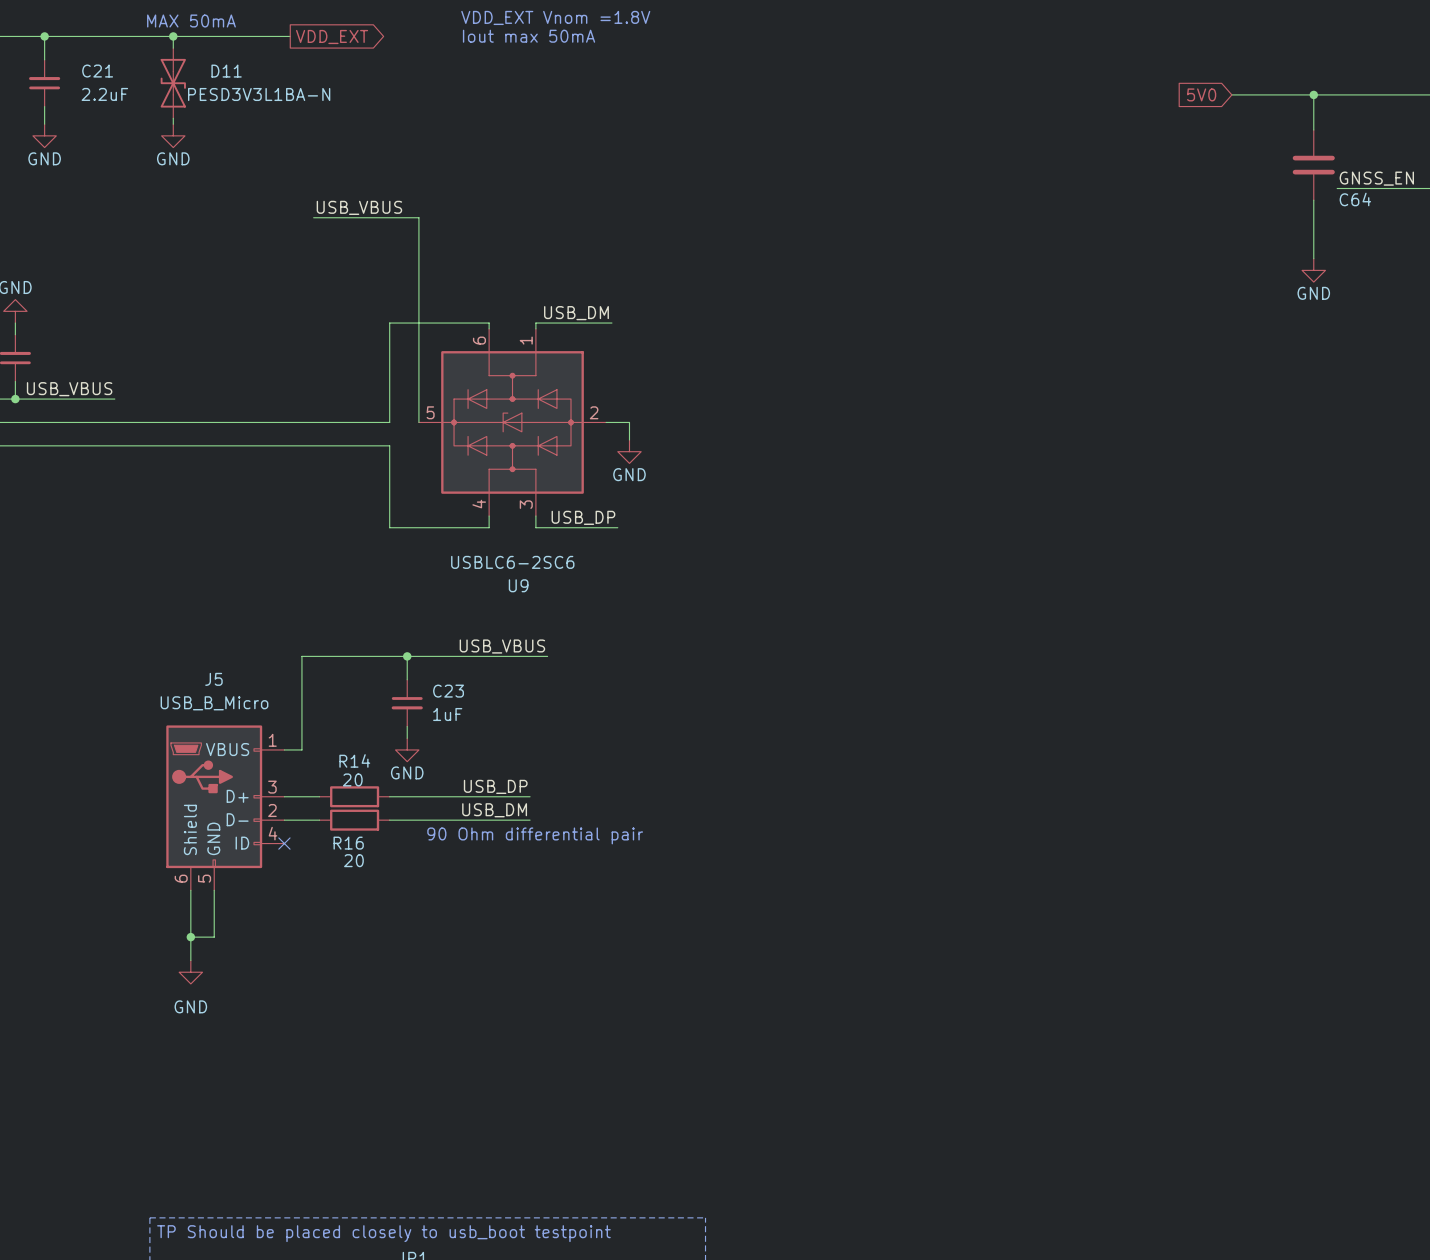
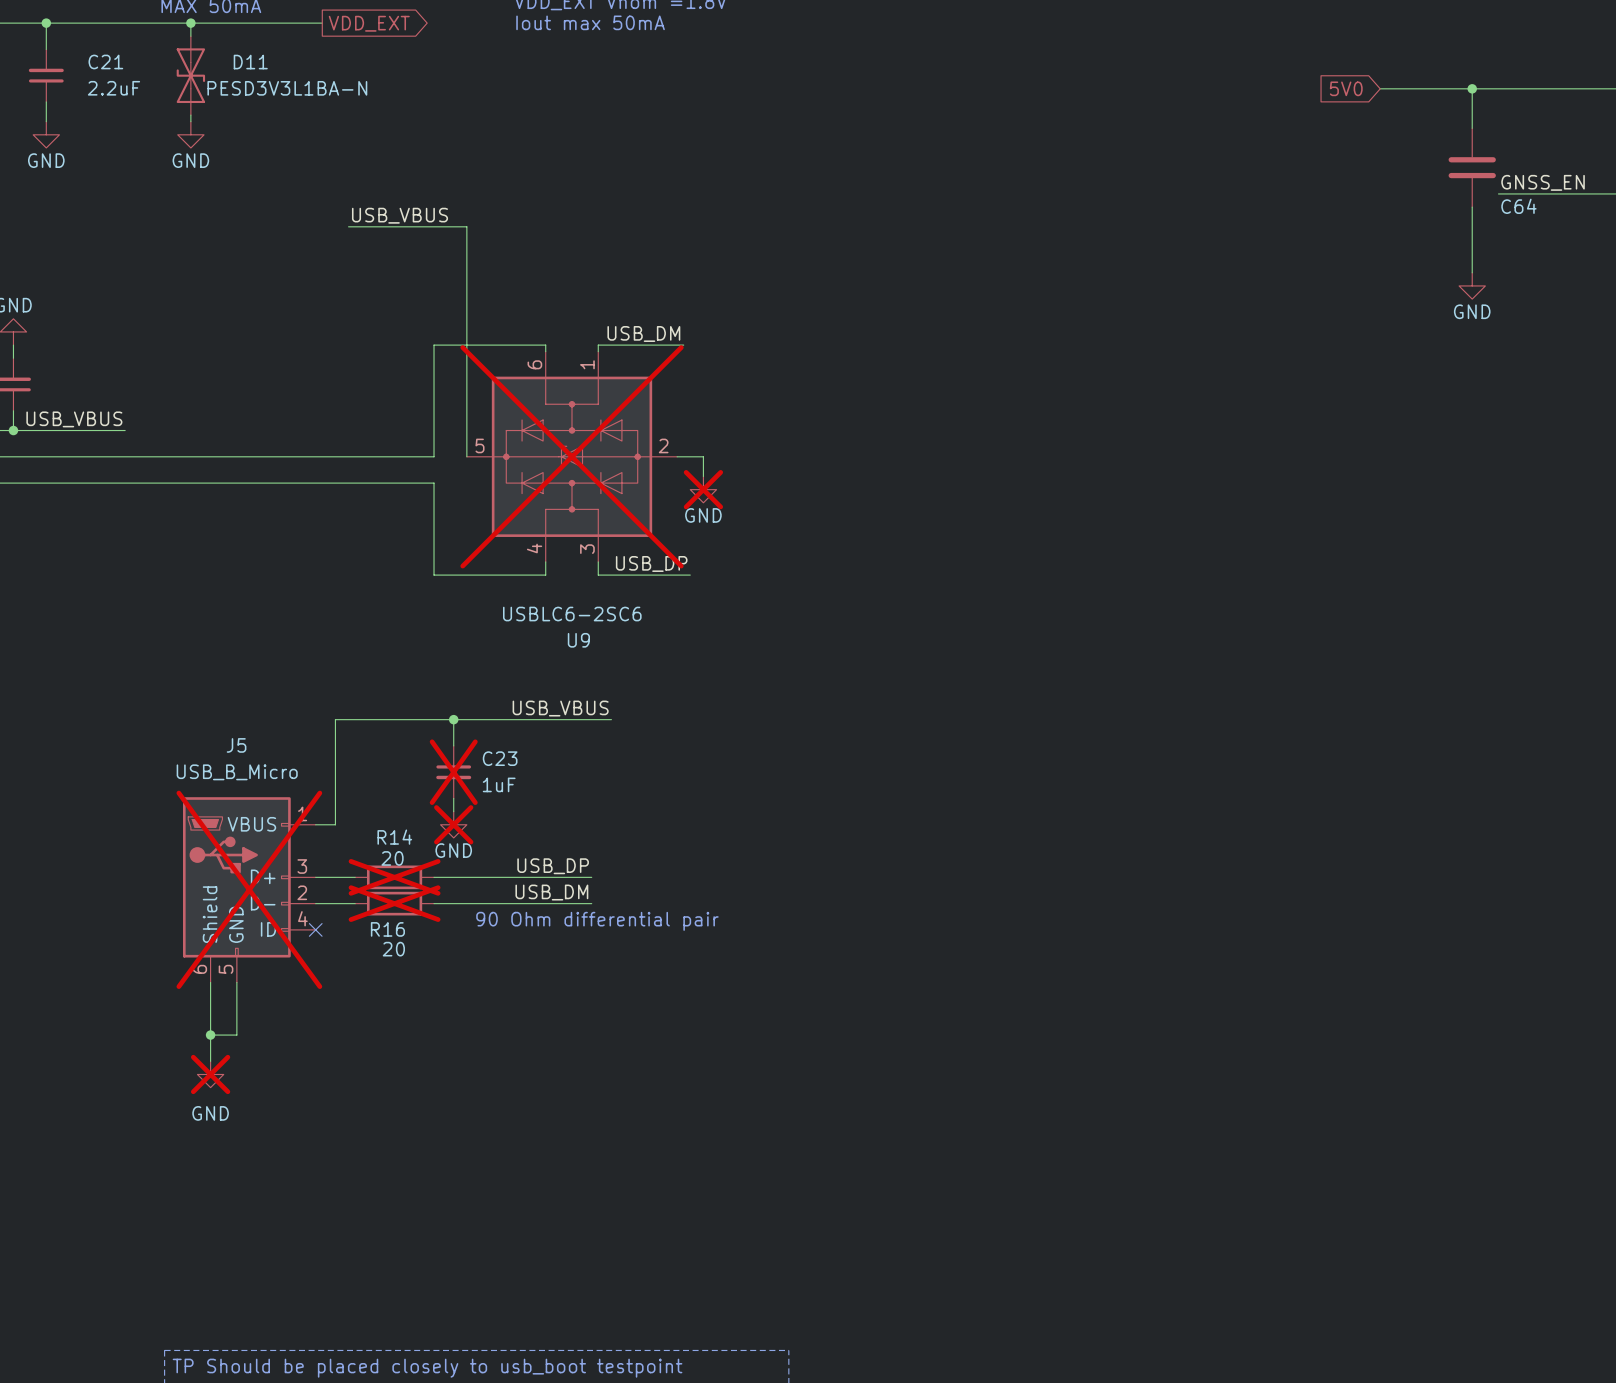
U9 do-not-place cross: none -> (571, 456)
power symbol do-not-place cross: none -> (703, 489)
C23 do-not-place cross: none -> (453, 772)
power symbol do-not-place cross: none -> (453, 824)
R14 do-not-place cross: none -> (394, 877)
J5 do-not-place cross: none -> (249, 889)
R16 do-not-place cross: none -> (394, 903)
power symbol do-not-place cross: none -> (210, 1074)

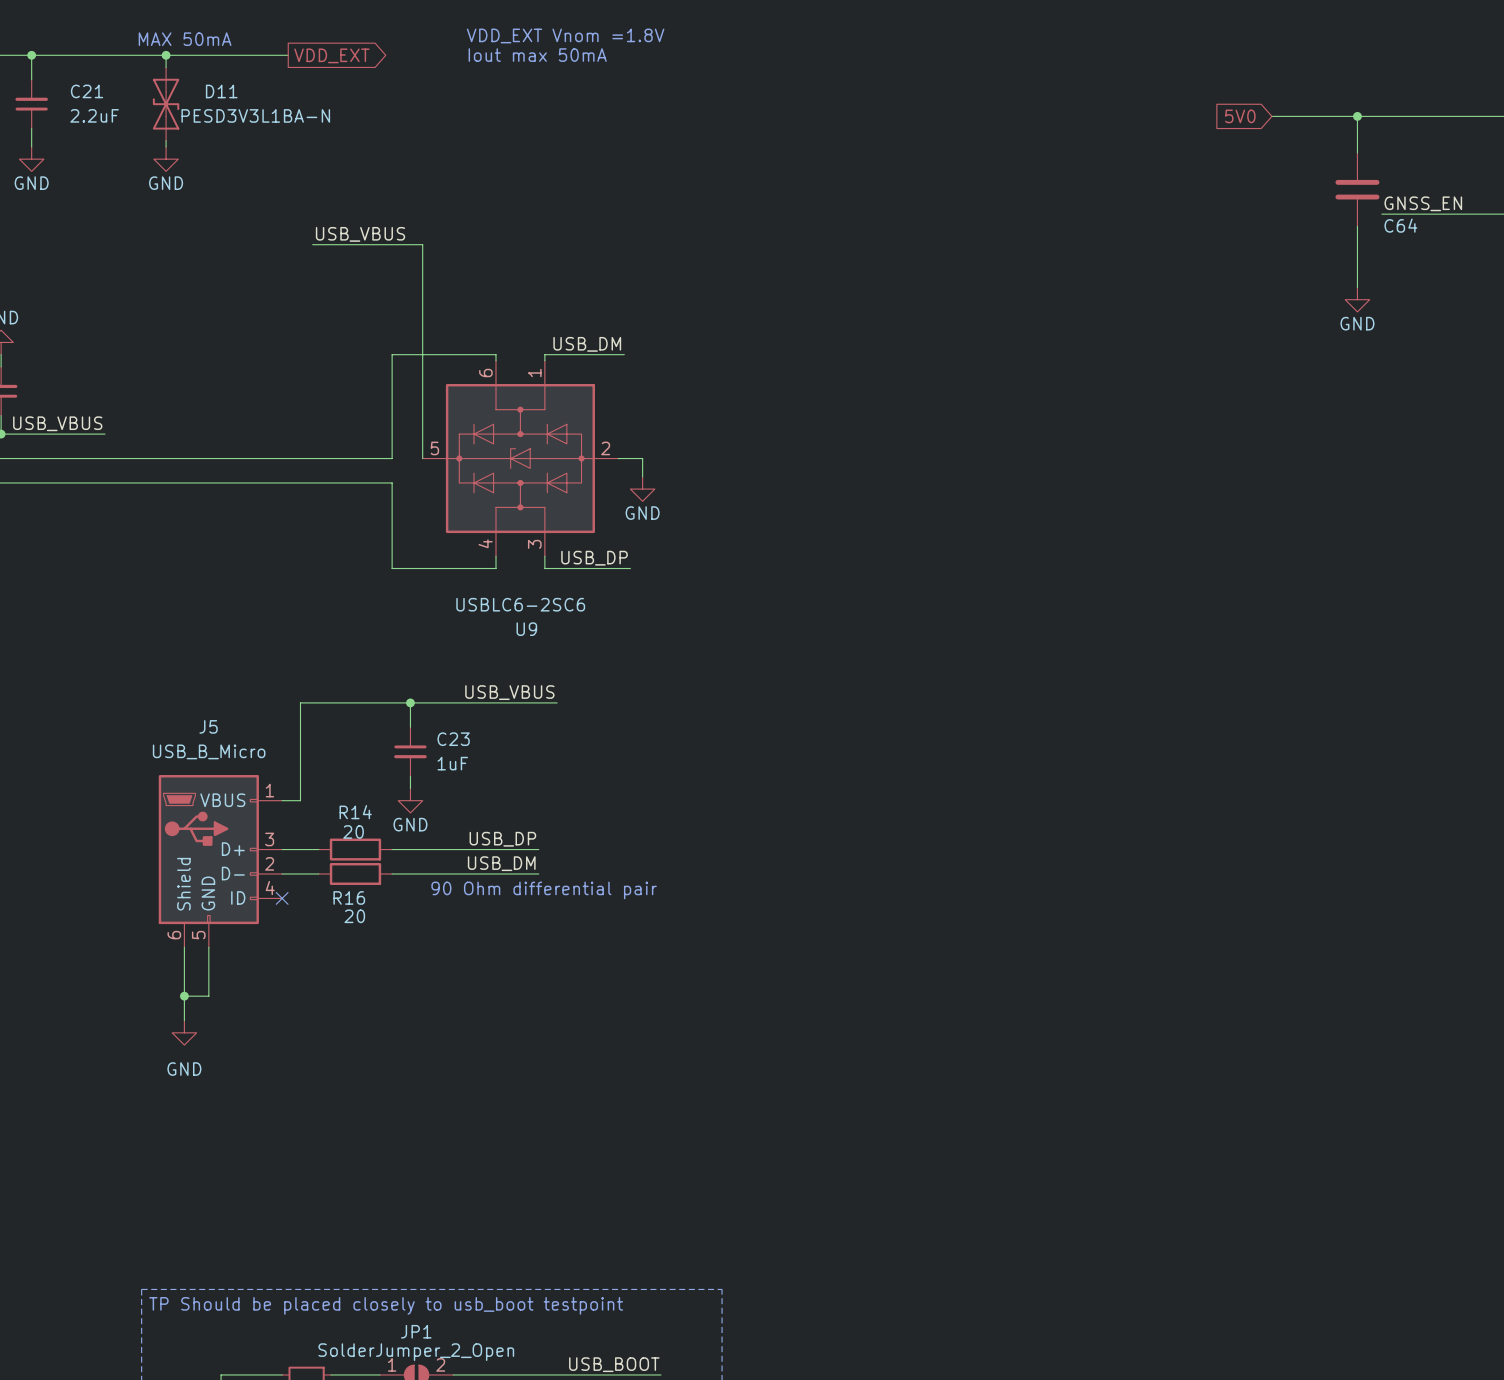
U9 do-not-place cross: (571, 456) -> none
power symbol do-not-place cross: (703, 489) -> none
C23 do-not-place cross: (453, 772) -> none
power symbol do-not-place cross: (453, 824) -> none
R14 do-not-place cross: (394, 877) -> none
J5 do-not-place cross: (249, 889) -> none
R16 do-not-place cross: (394, 903) -> none
power symbol do-not-place cross: (210, 1074) -> none

